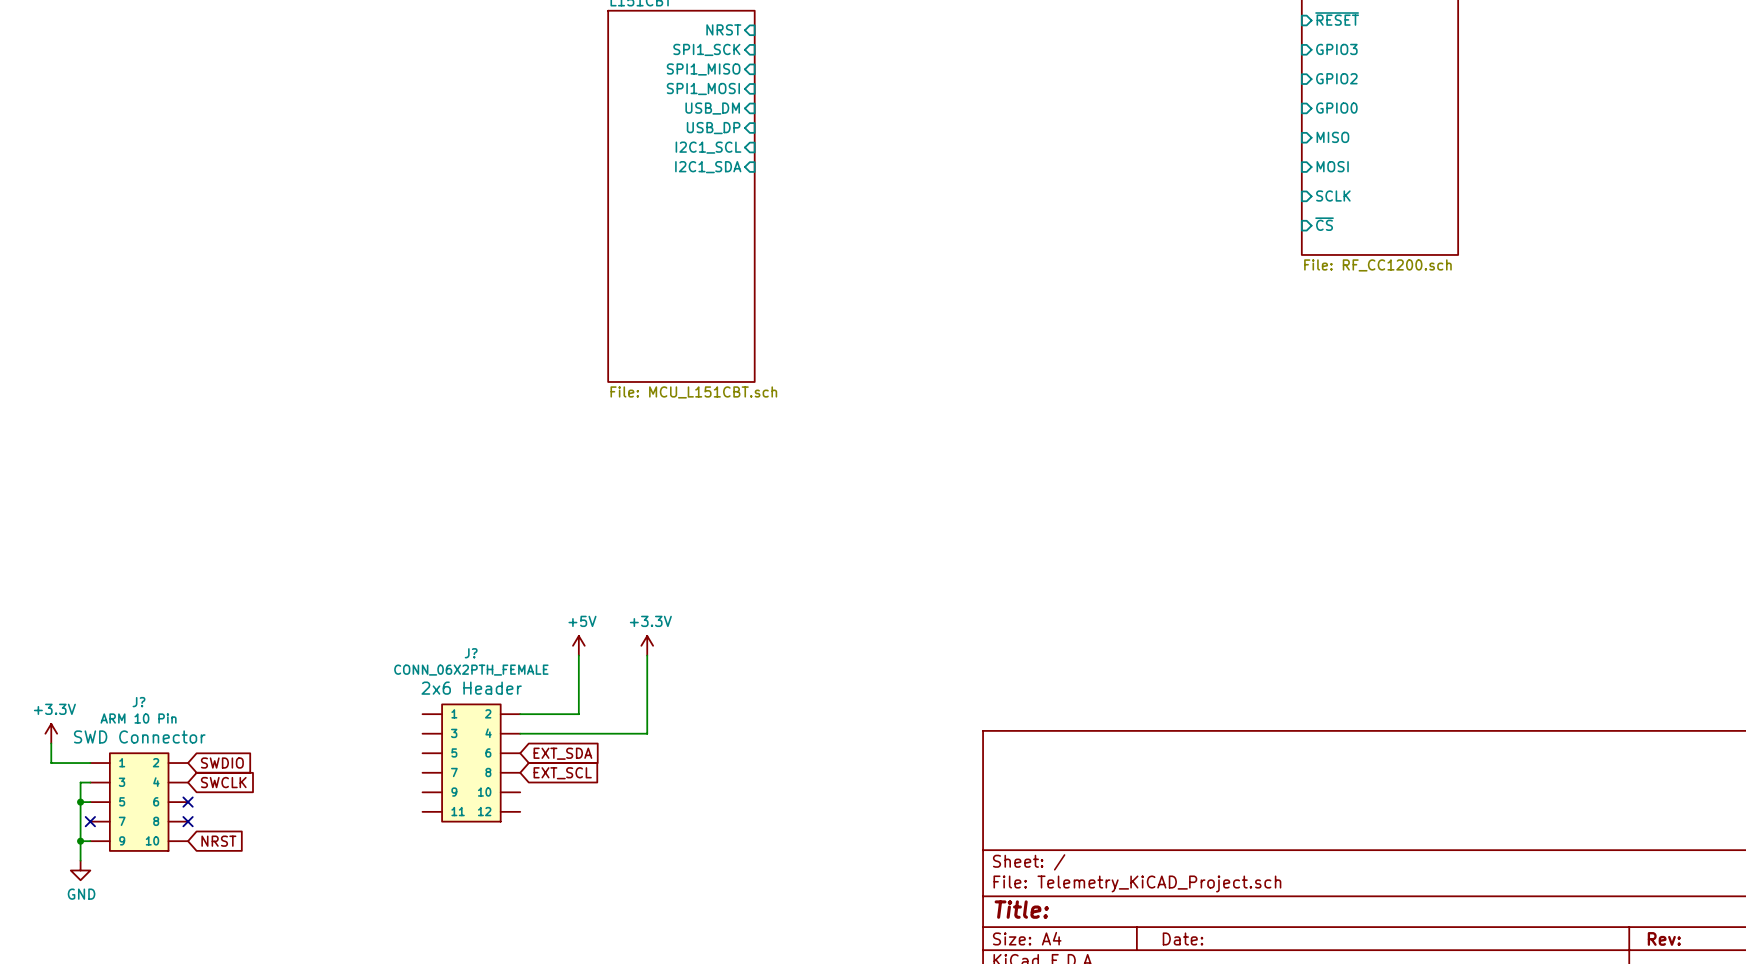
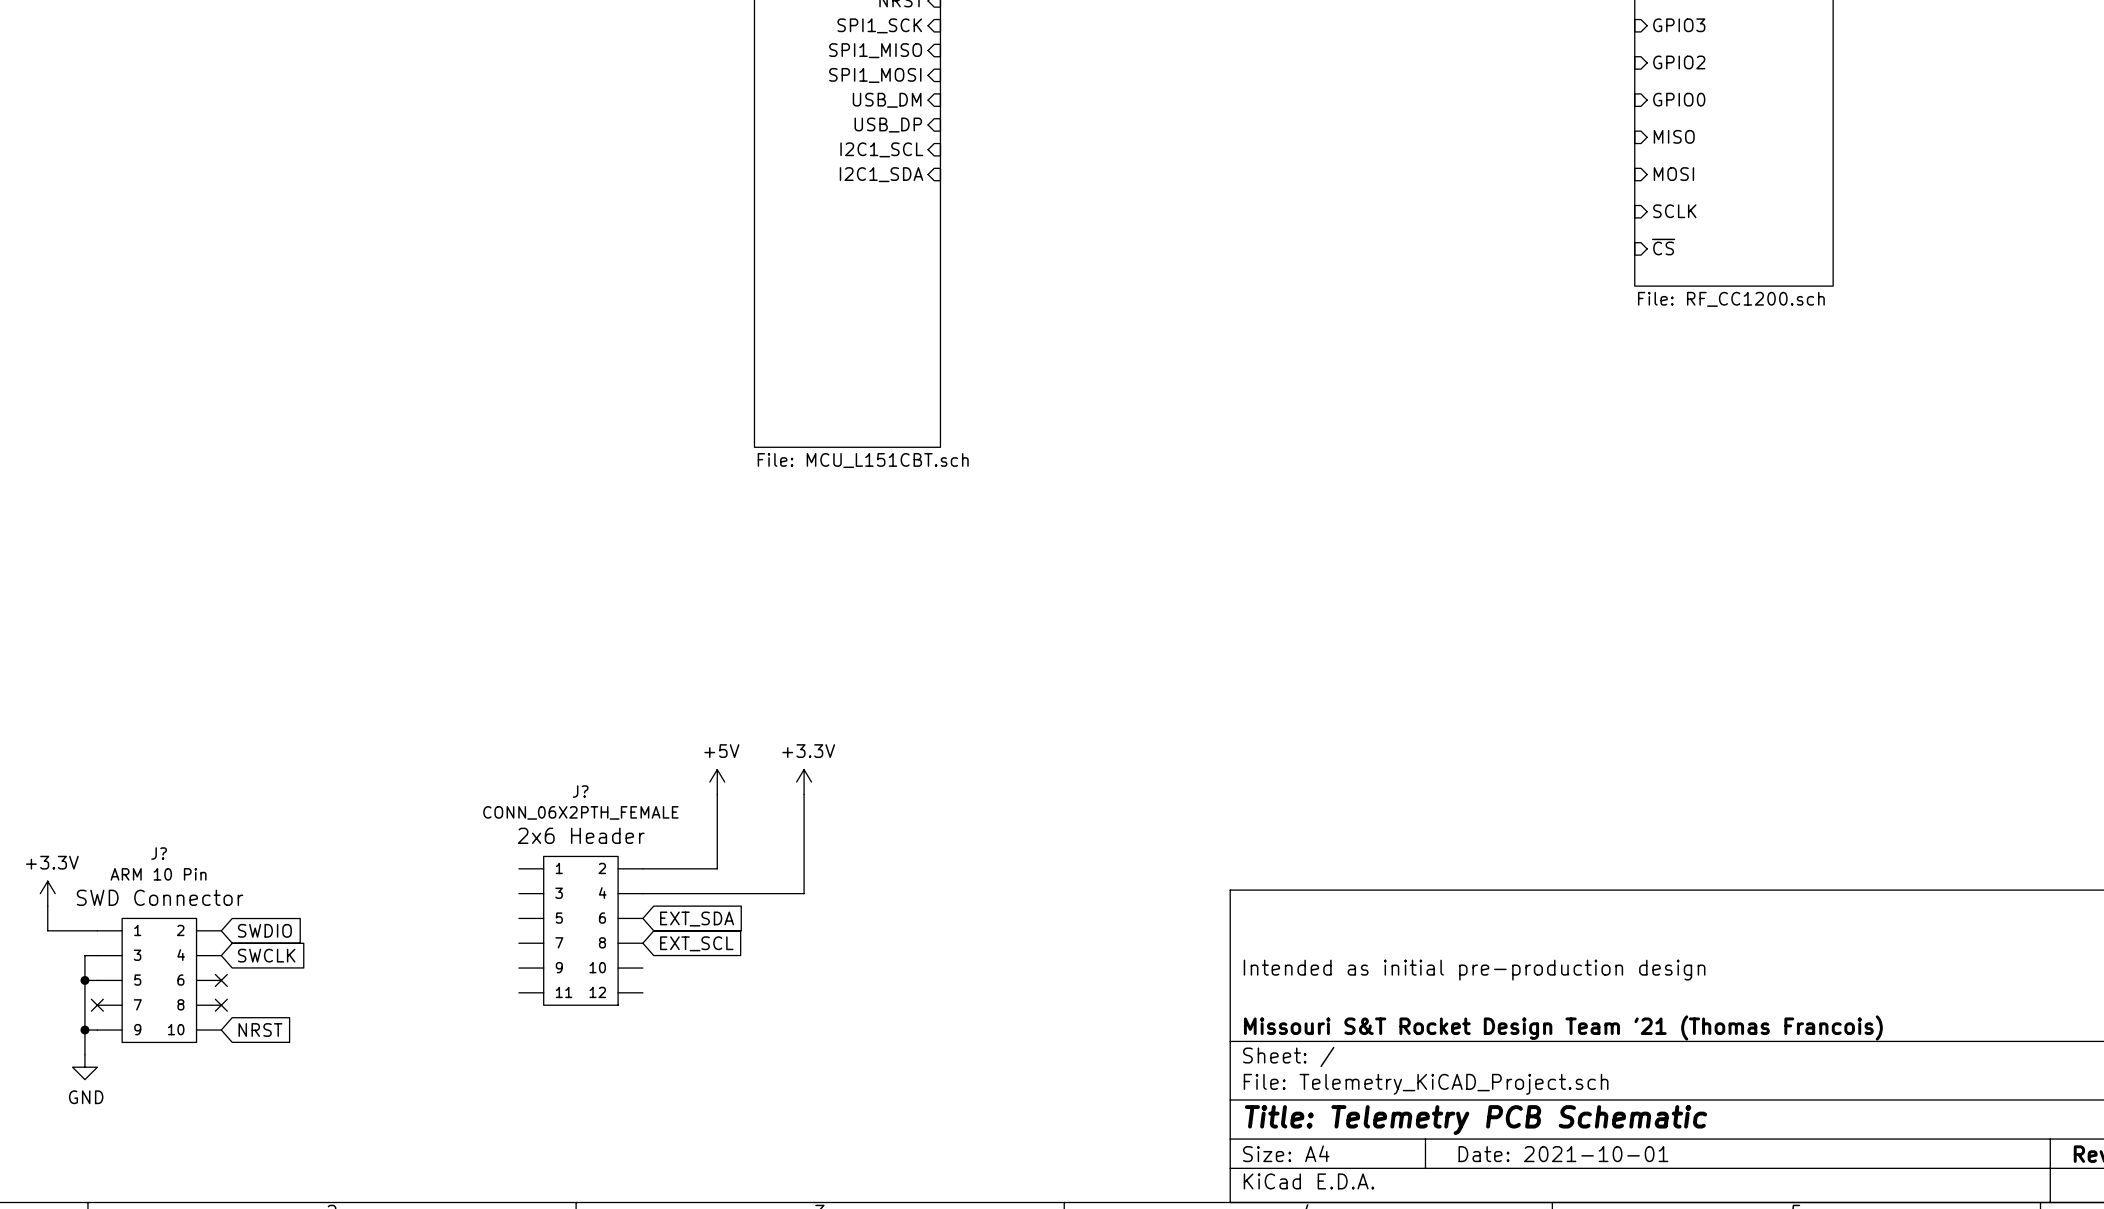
title block: none -> Intended as initial pre-production design (1474, 970)
title block: none -> Missouri S&T Rocket Design Team '21 (Thomas Francois) (1563, 1027)
title block: Title: (1021, 909) -> Title: Telemetry PCB Schematic (1476, 1120)
title block: Date: (1183, 938) -> Date: 2021-10-01 (1563, 1154)

